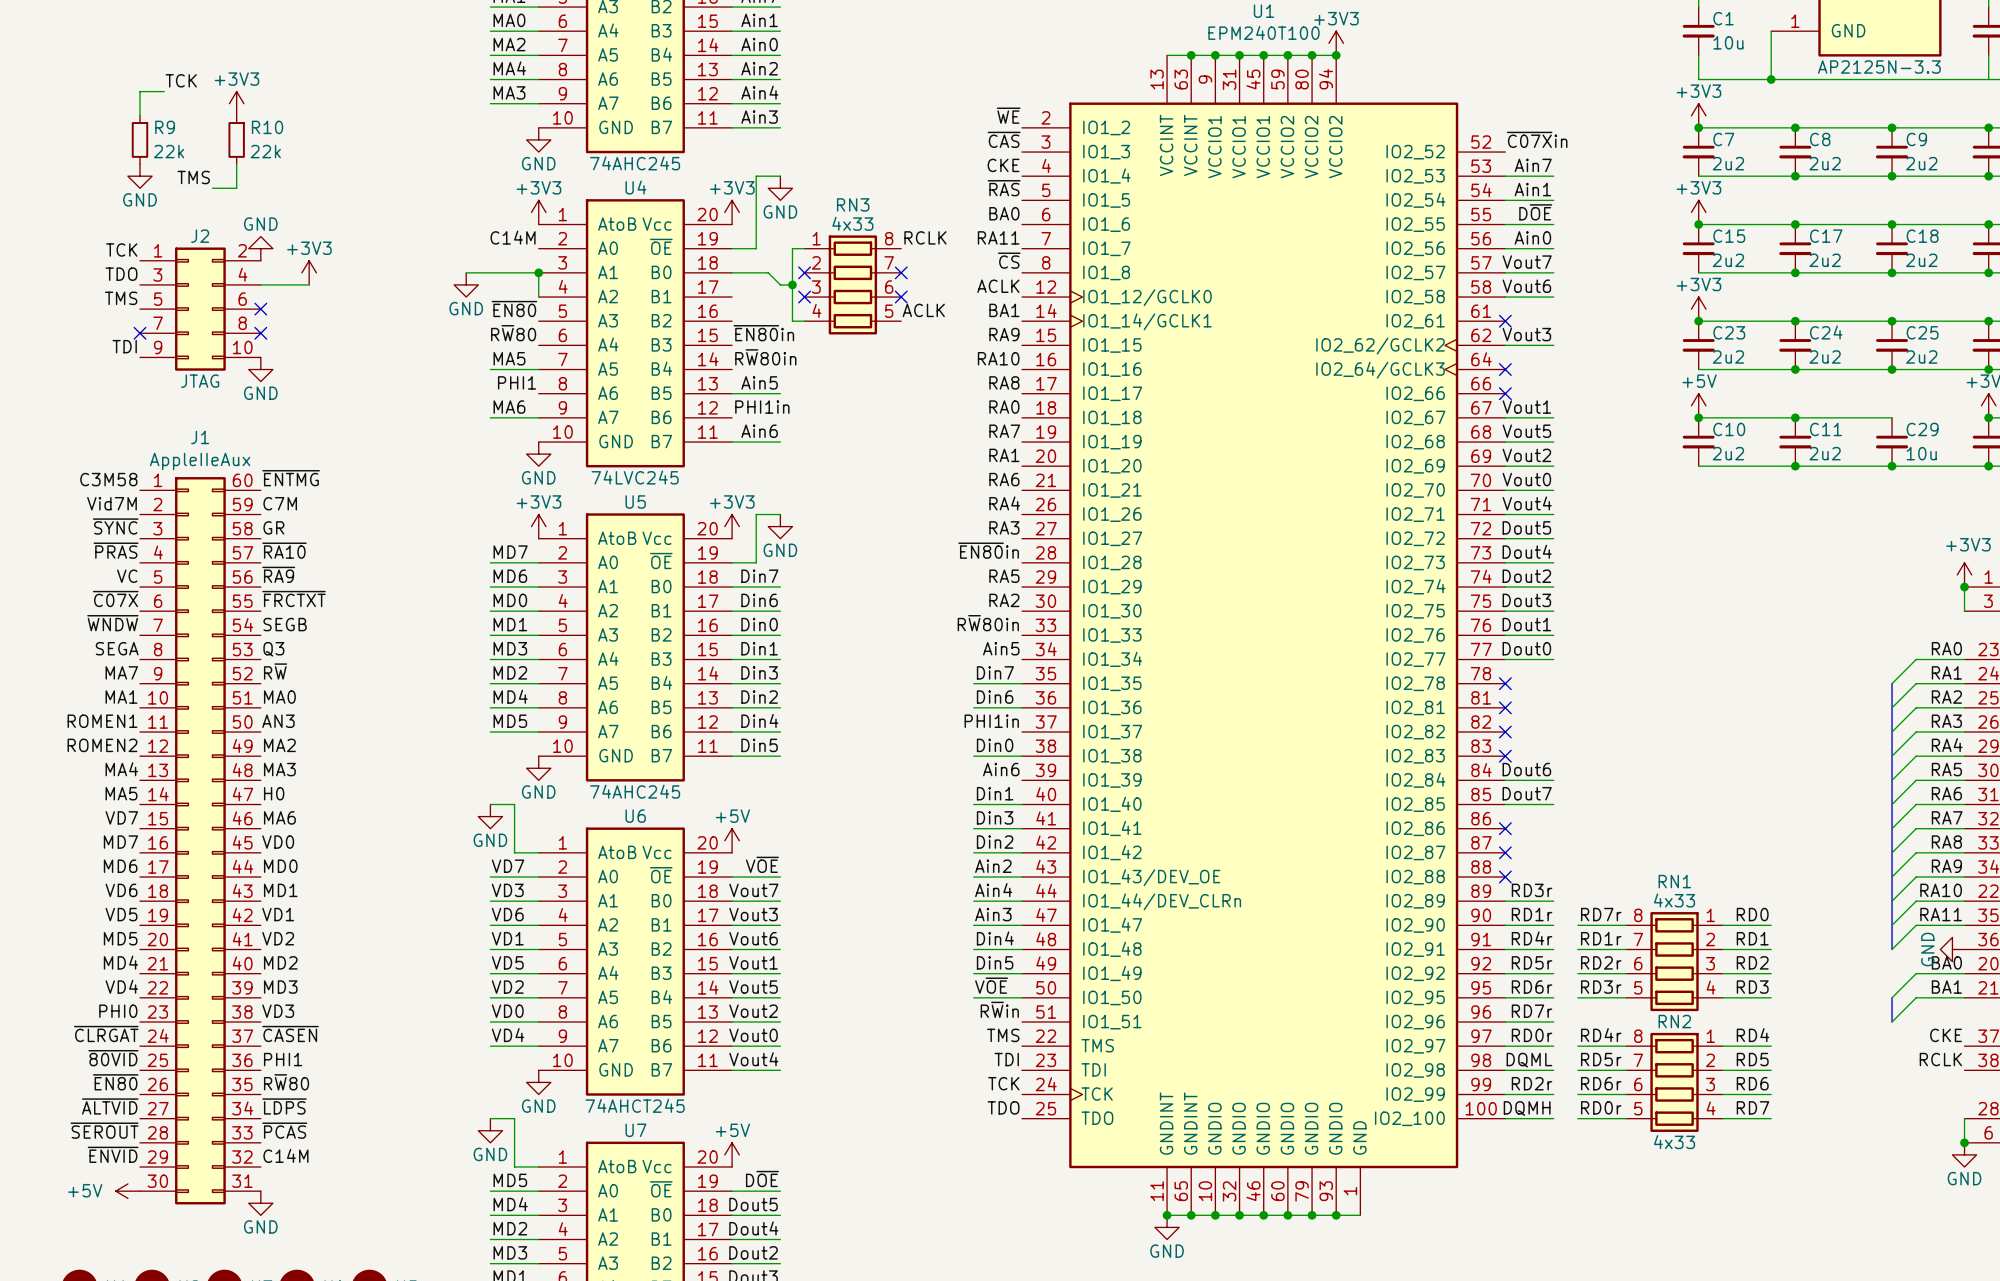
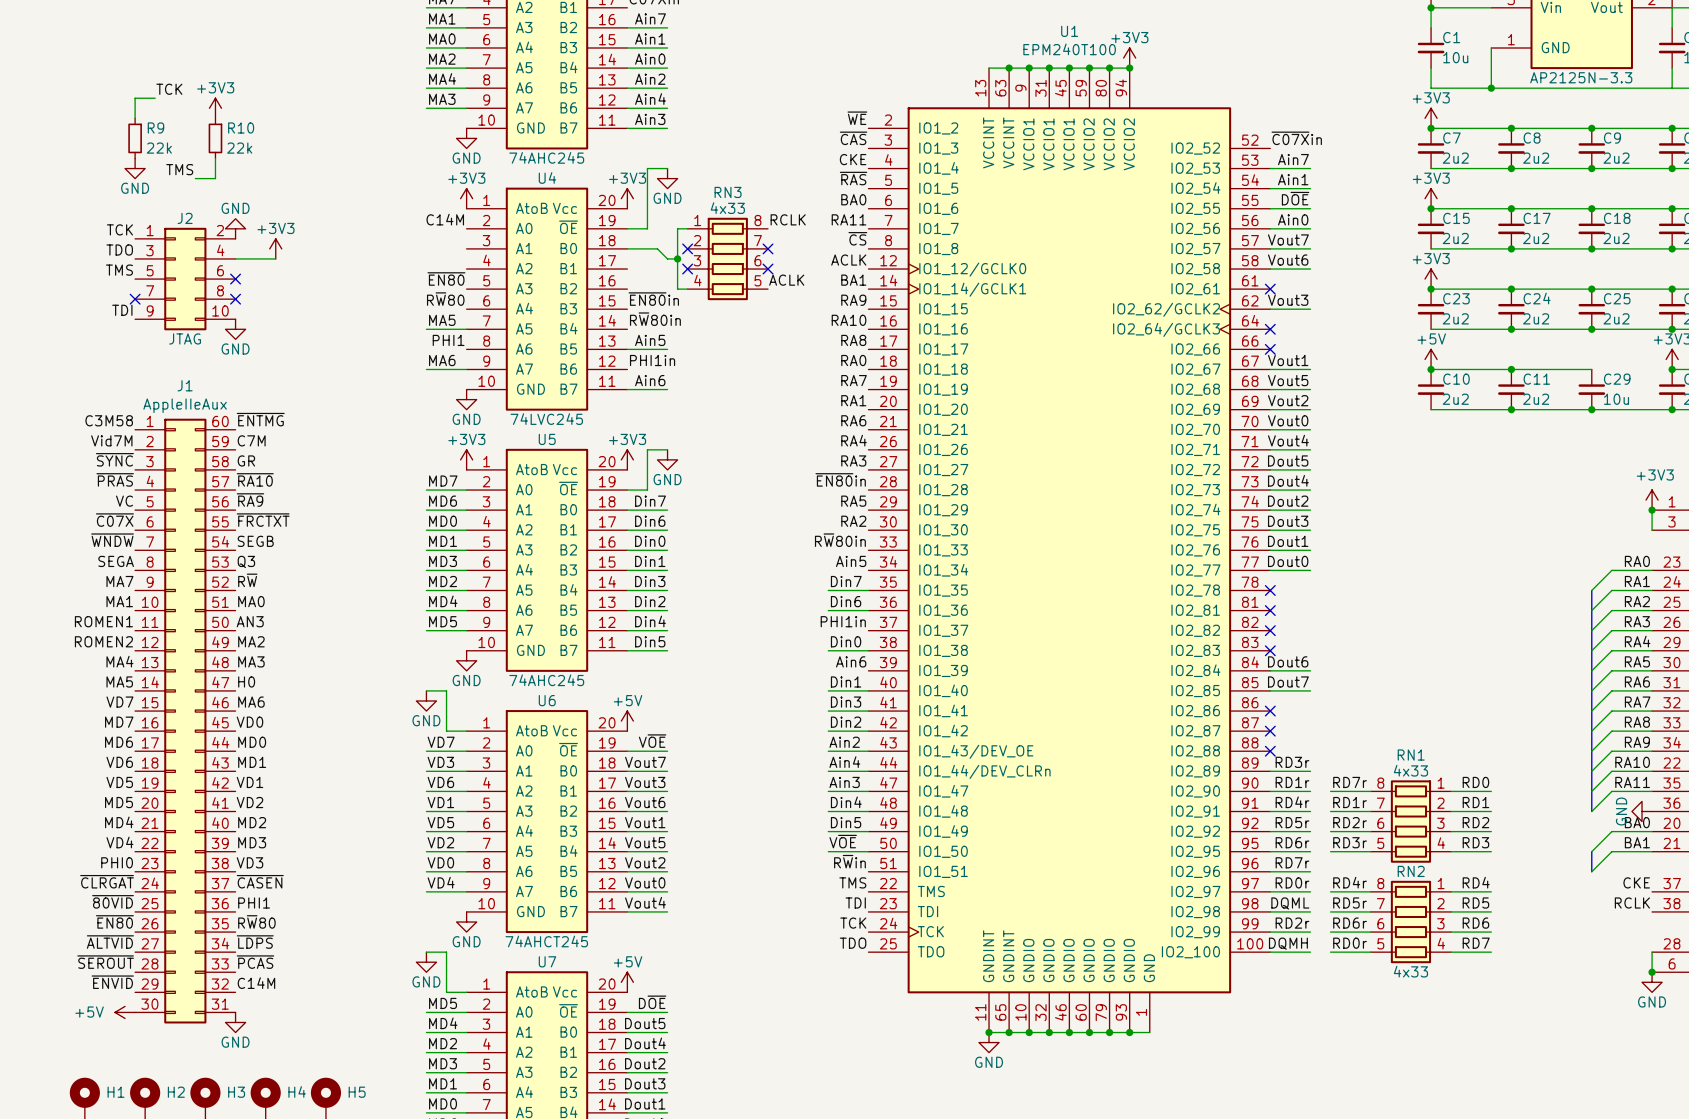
wire: (466, 272) (538, 272) (538, 297) -> none
junction: (538, 272) -> none
power symbol: GND (466, 284) -> none

